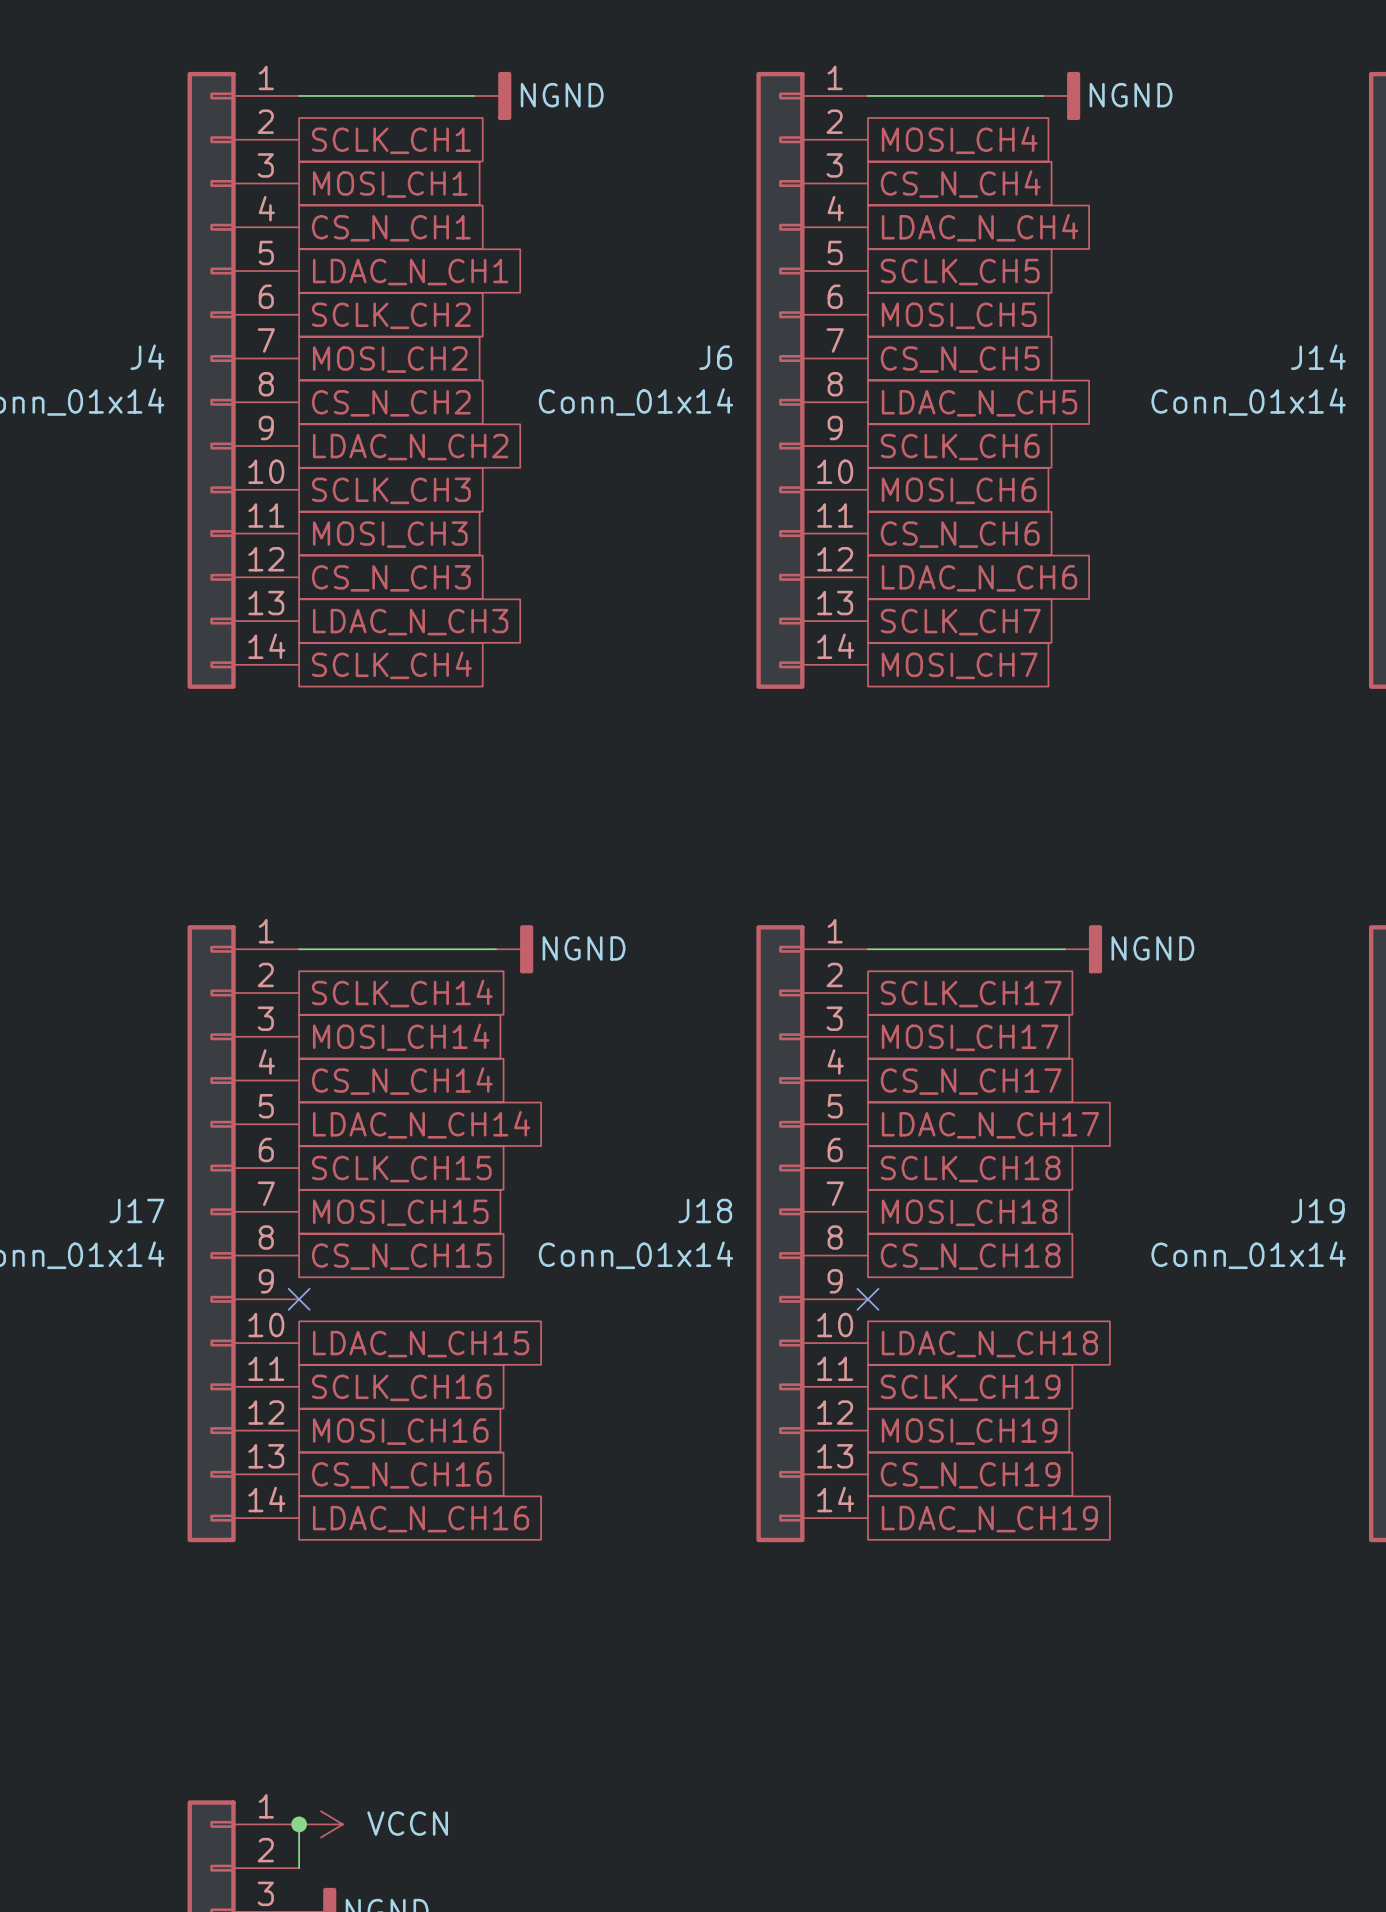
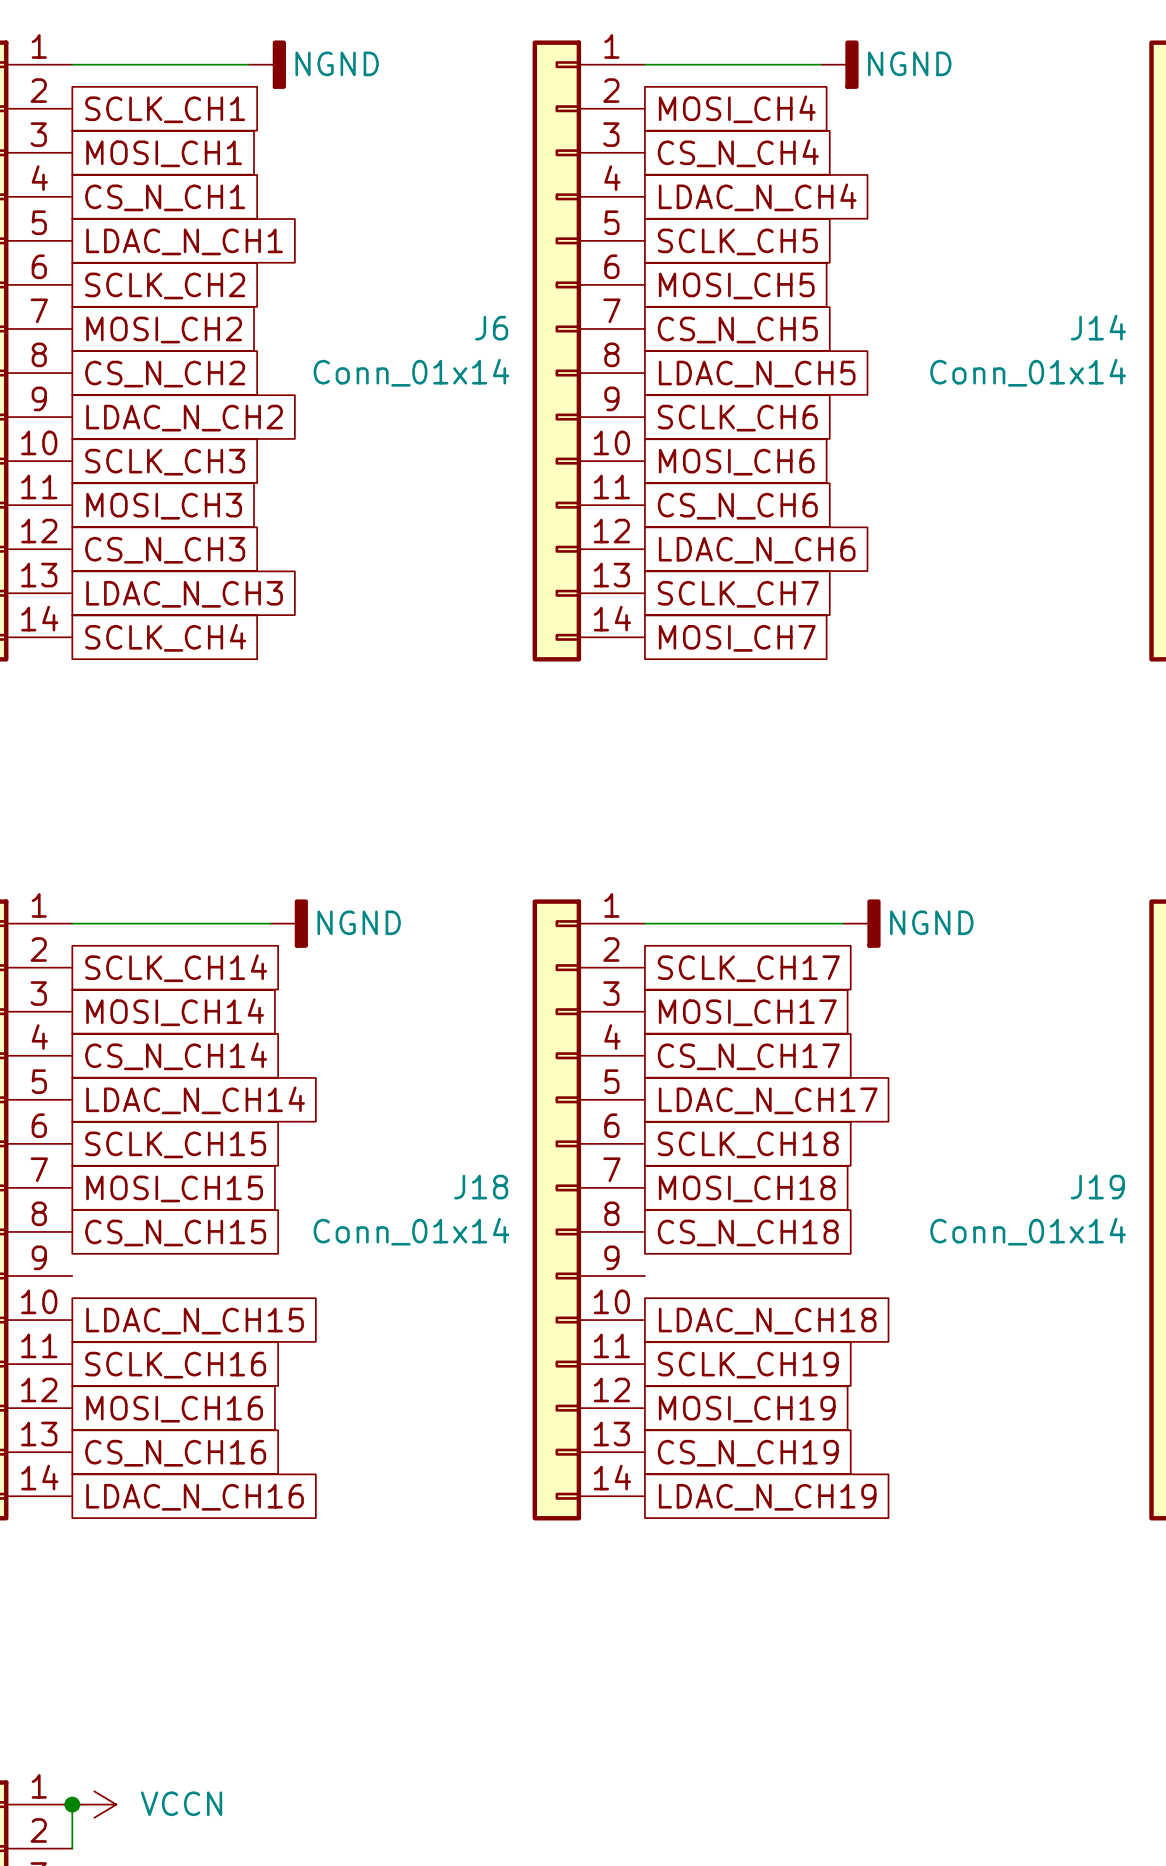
no-connect mark: (299, 1299) -> none
no-connect mark: (867, 1299) -> none

